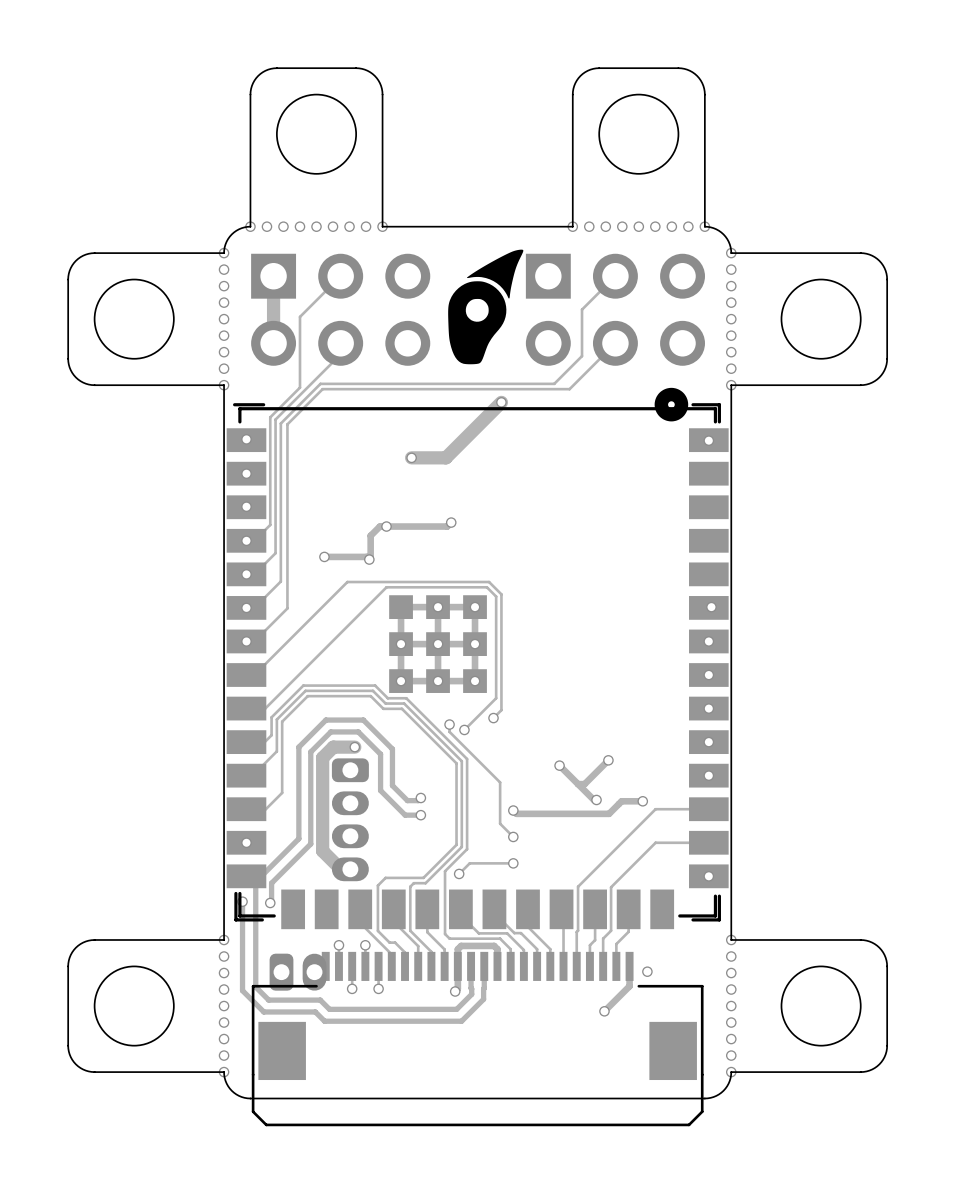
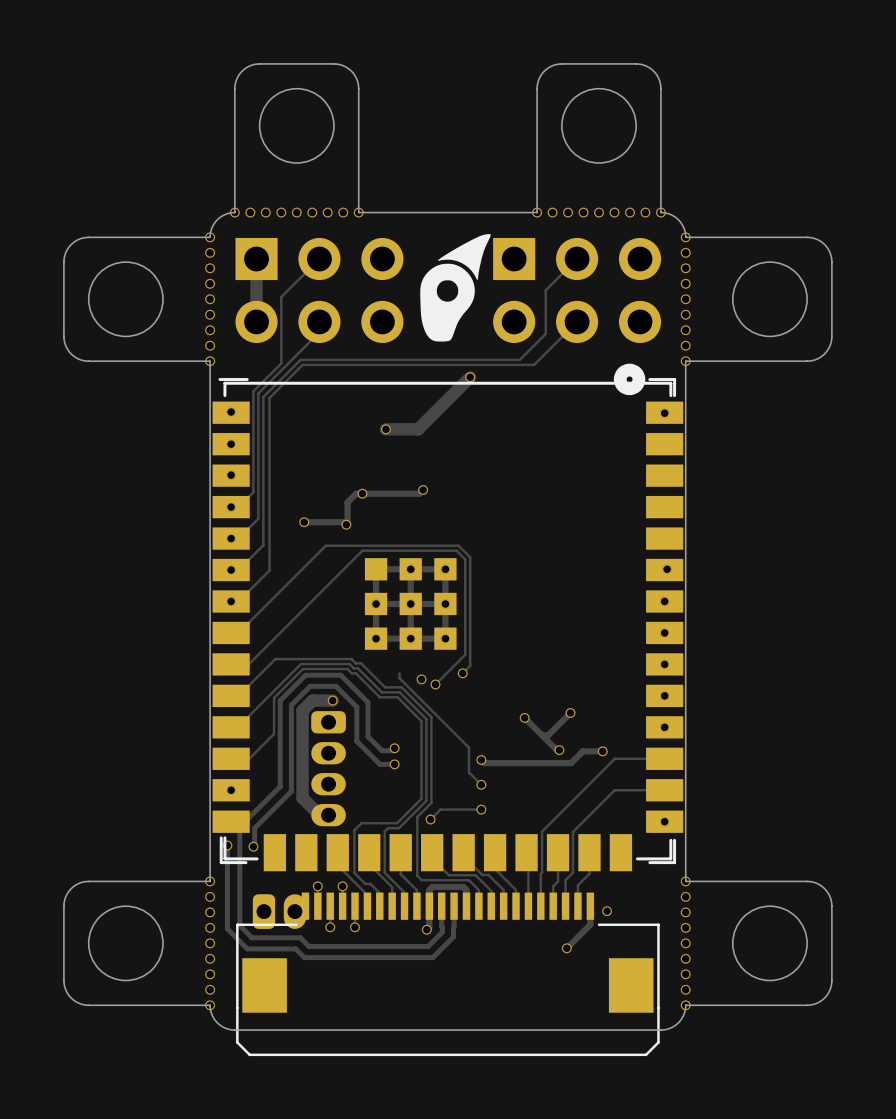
track: (449, 724) (449, 731) (500, 782) (500, 797) -> (399, 673) (399, 678) (468, 747)
track: (254, 742) (264, 742) (271, 735) (271, 717) (303, 685) (375, 685) (387, 698) (406, 698) (467, 759) (467, 849) (460, 856) -> (238, 695) (275, 659) (351, 659) (355, 663) (361, 663) (385, 687) (401, 687) (431, 717) (431, 802)
track: (252, 775) (276, 751) (276, 719) (305, 690) (372, 690) (385, 703) (404, 703) (461, 761) (461, 847) (454, 854) -> (236, 727) (301, 664) (349, 664) (353, 668) (357, 668) (381, 692) (399, 692) (426, 719) (426, 800)
track: (282, 792) (282, 721) (307, 696) (370, 696) (383, 708) (401, 708) (456, 763) (456, 844) (449, 851) -> (264, 743) (274, 734) (274, 698) (303, 669) (347, 669) (351, 673) (355, 673) (379, 697) (397, 697) (421, 721) (421, 798)

